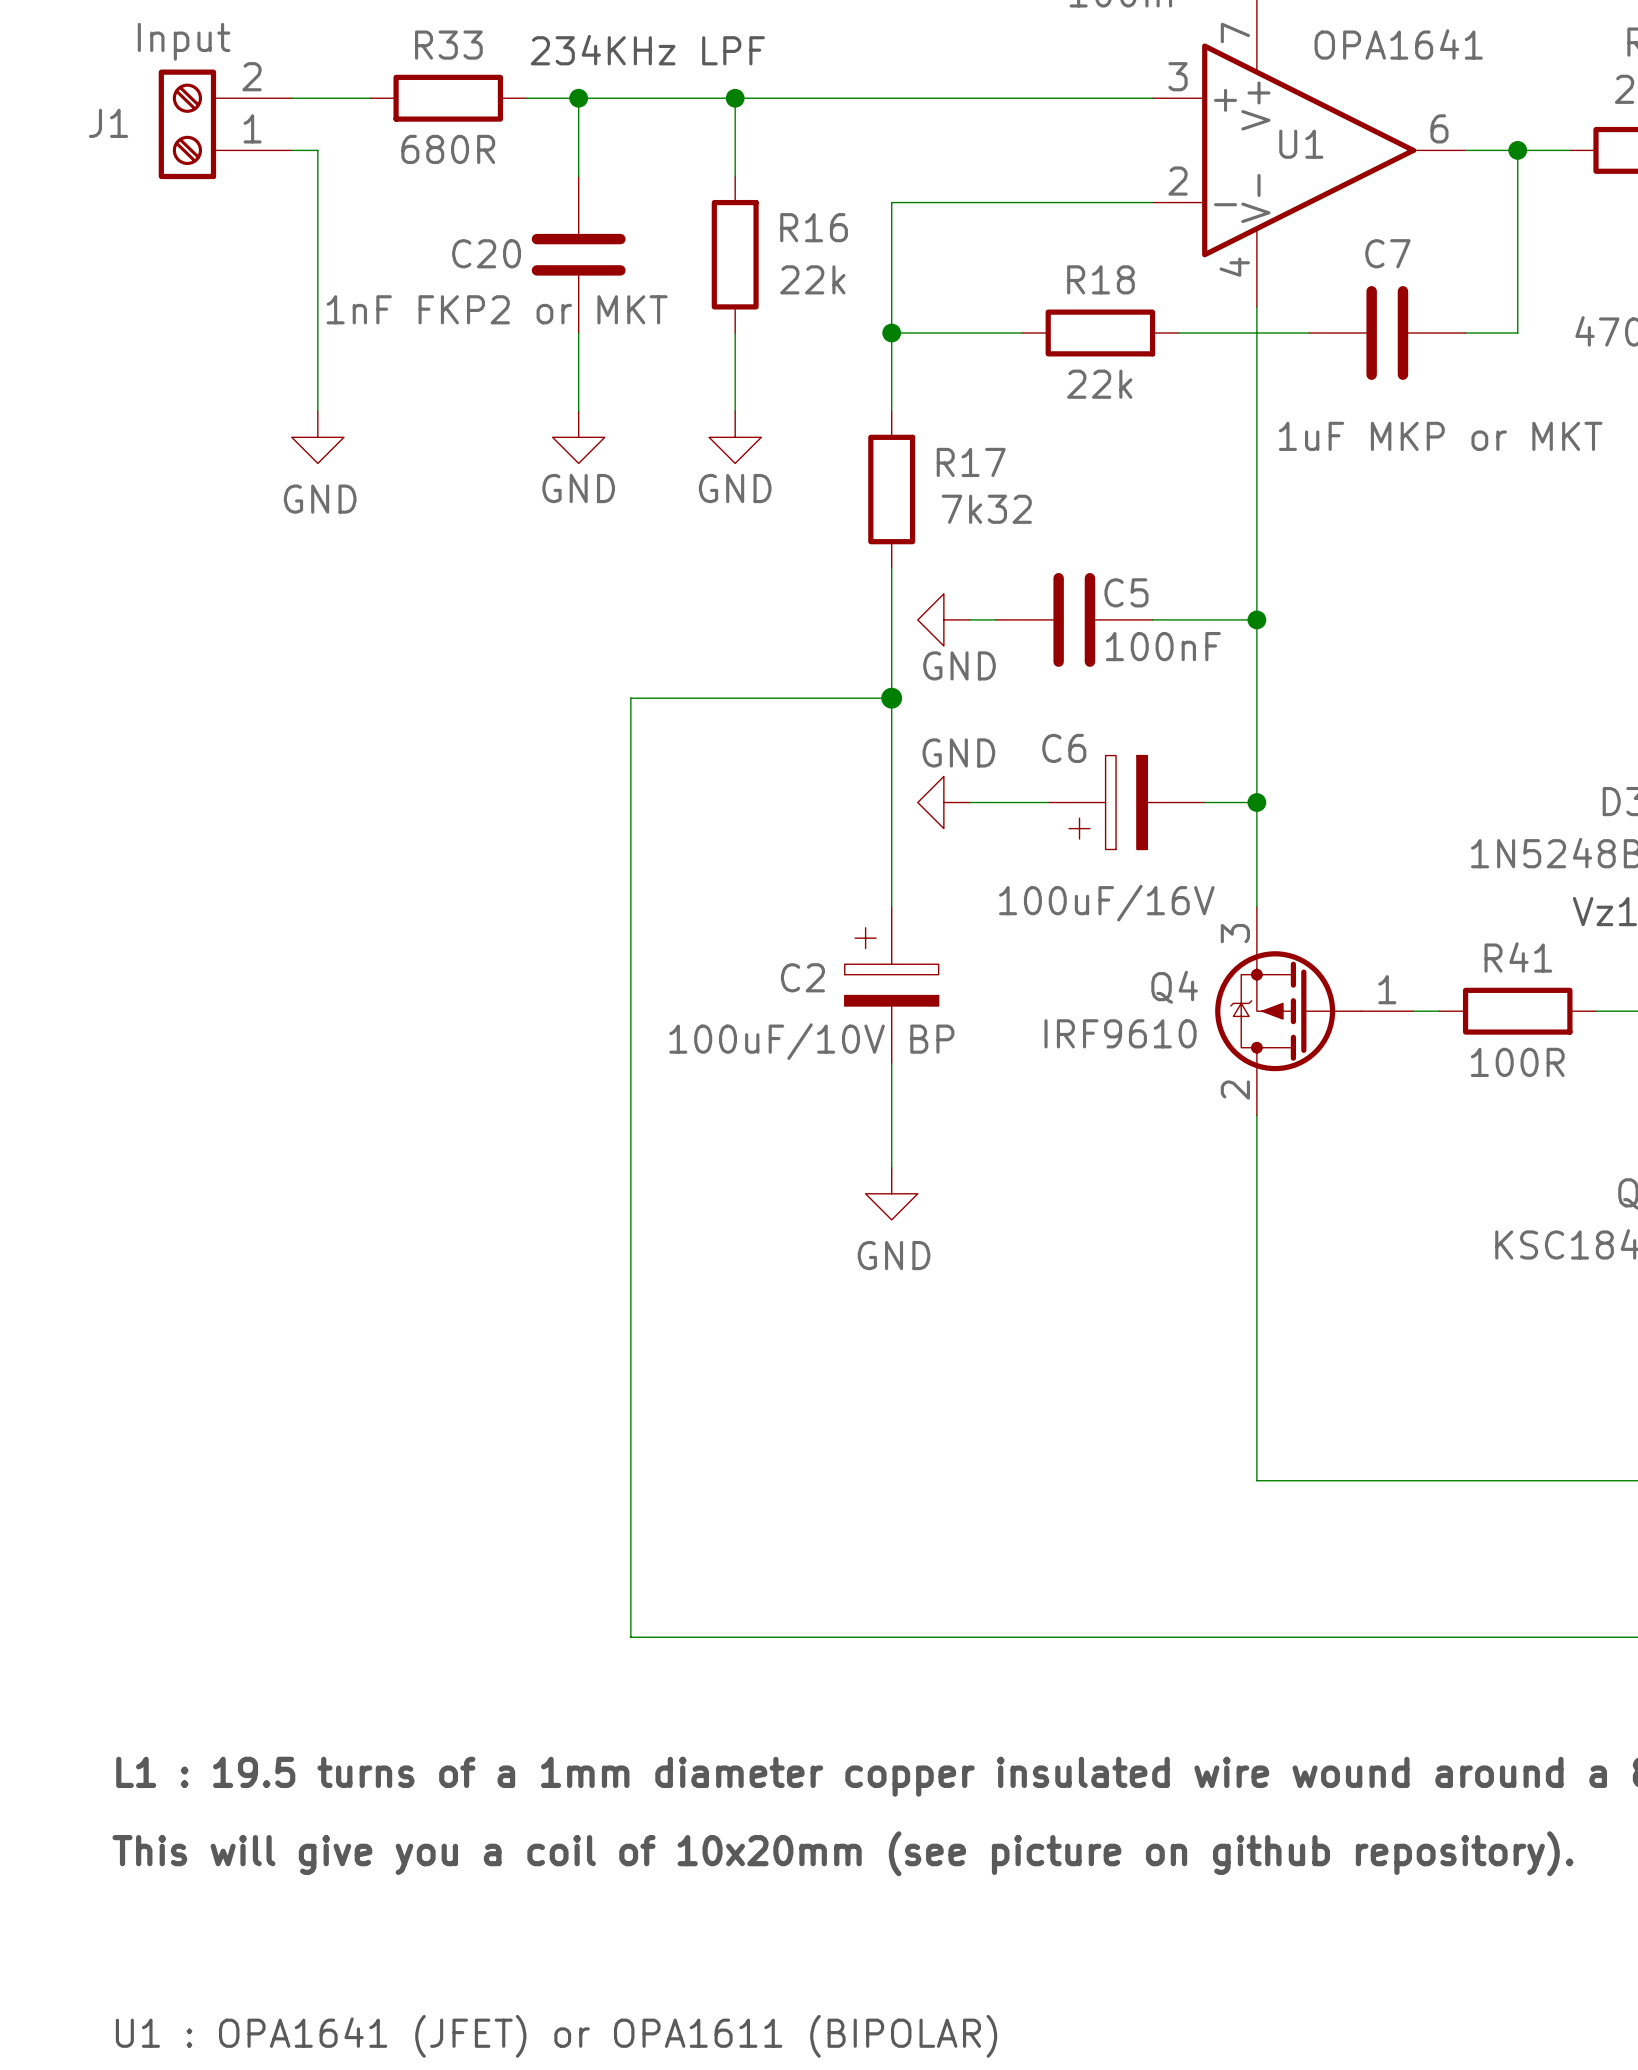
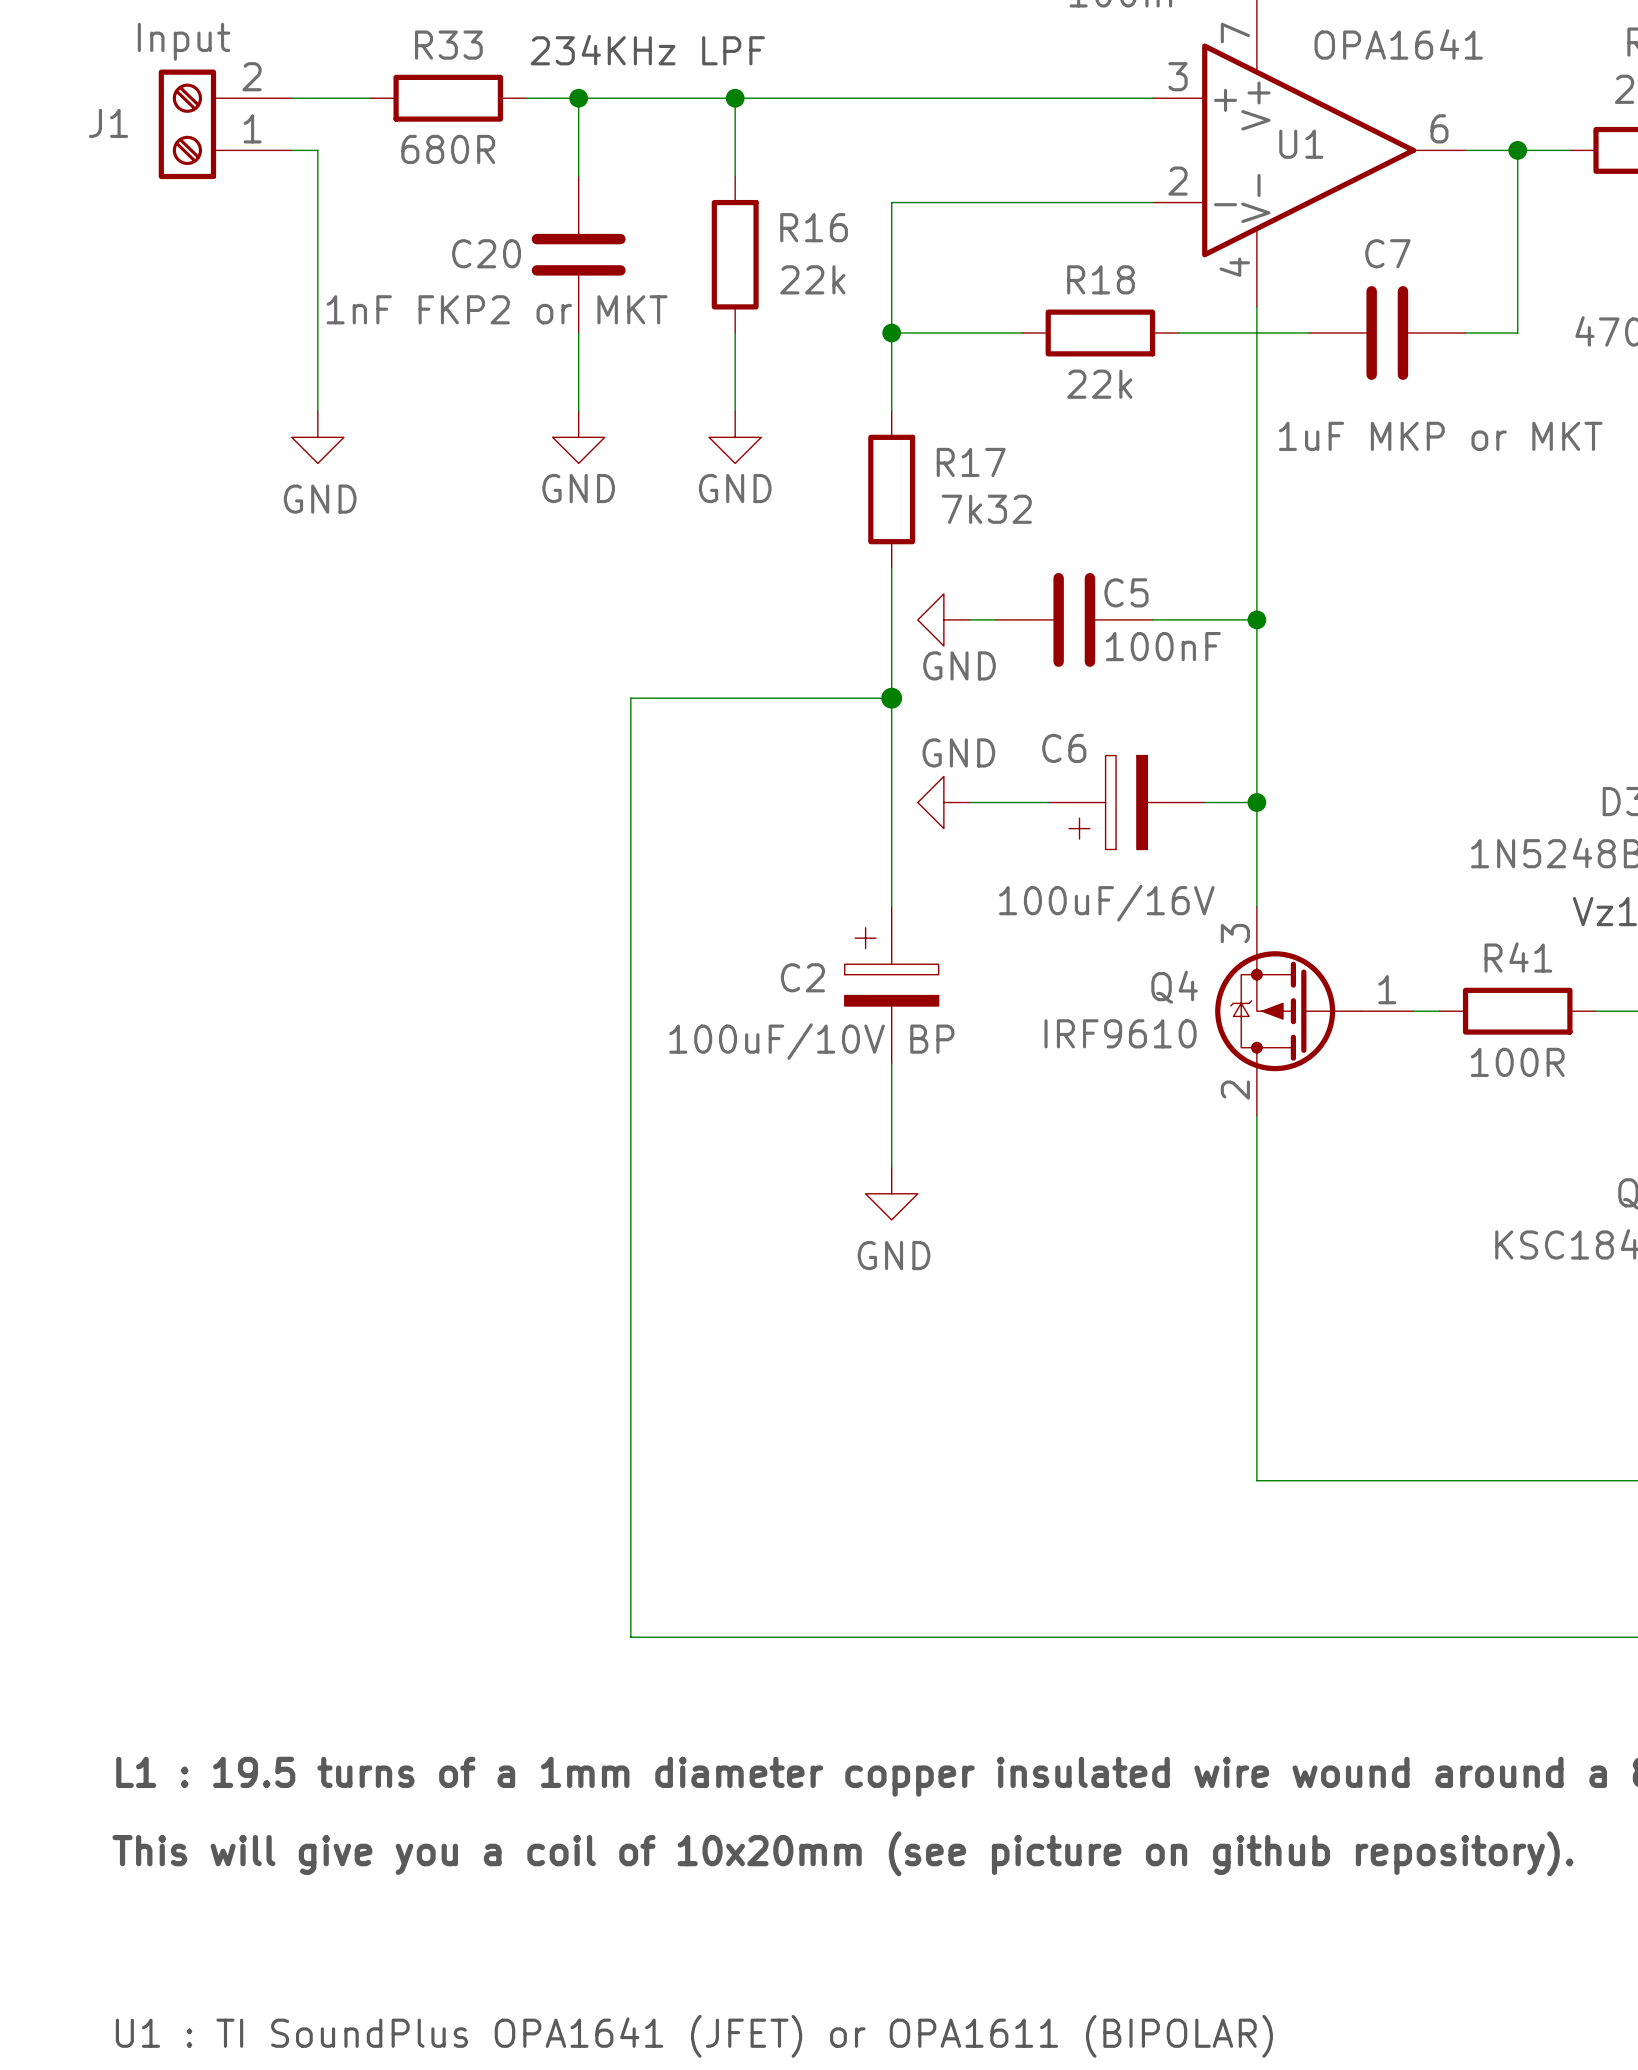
text: U1 : OPA1641 (JFET) or OPA1611 (BIPOLAR) (556, 2036) -> U1 : TI SoundPlus OPA1641 (JFET) or OPA1611 (BIPOLAR) (694, 2036)

